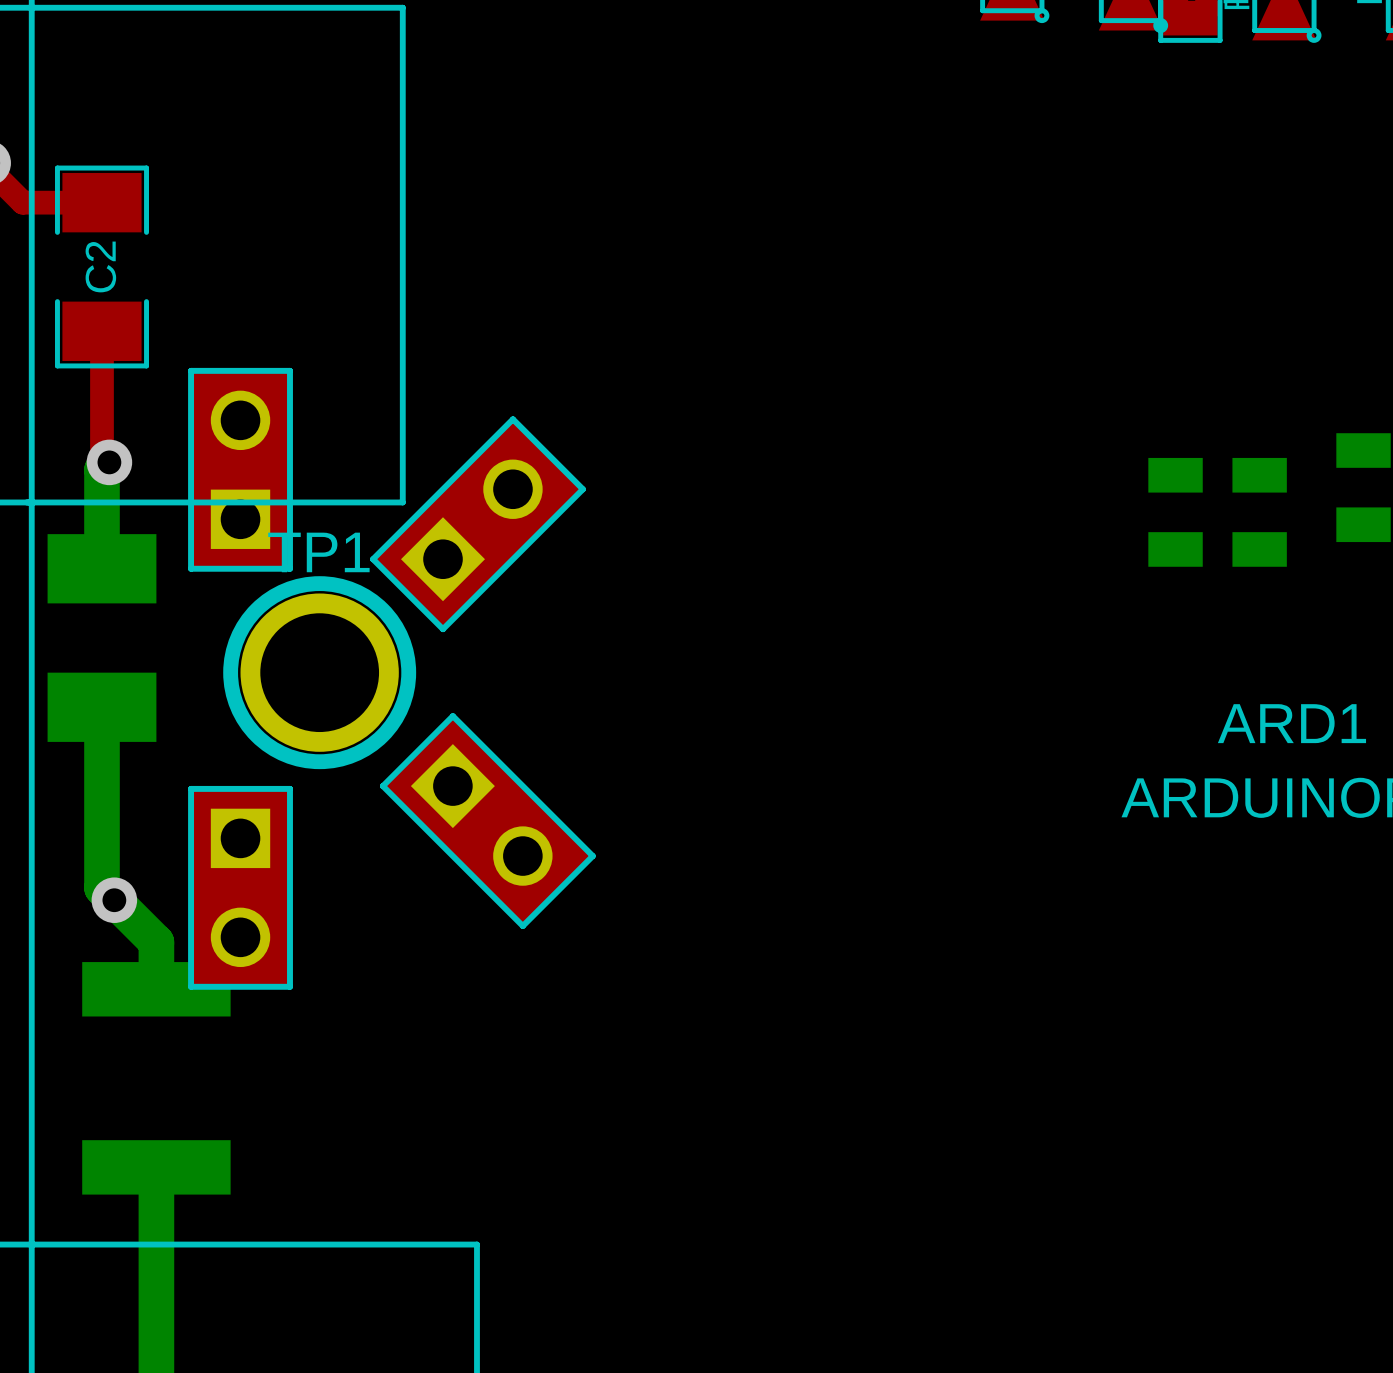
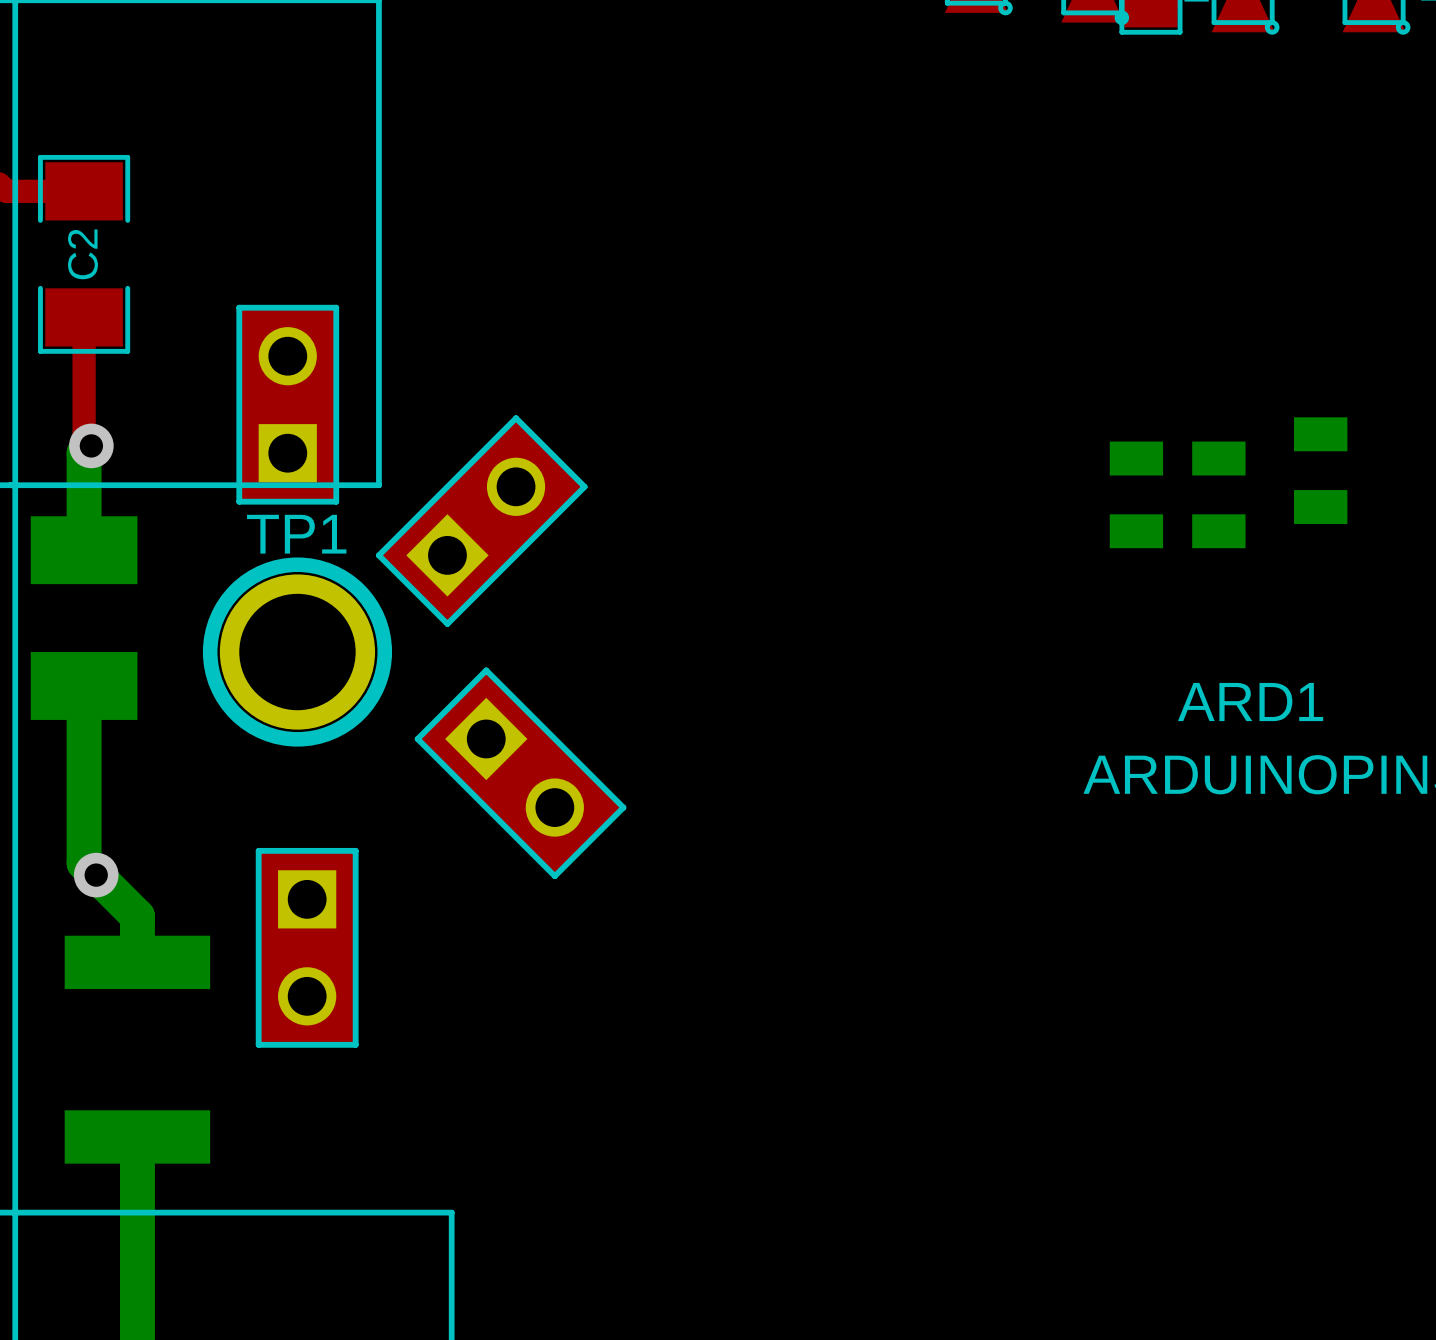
part position: (240, 469) -> (287, 404)
part position: (477, 524) -> (481, 521)
part position: (487, 821) -> (520, 773)
part position: (240, 887) -> (307, 947)

